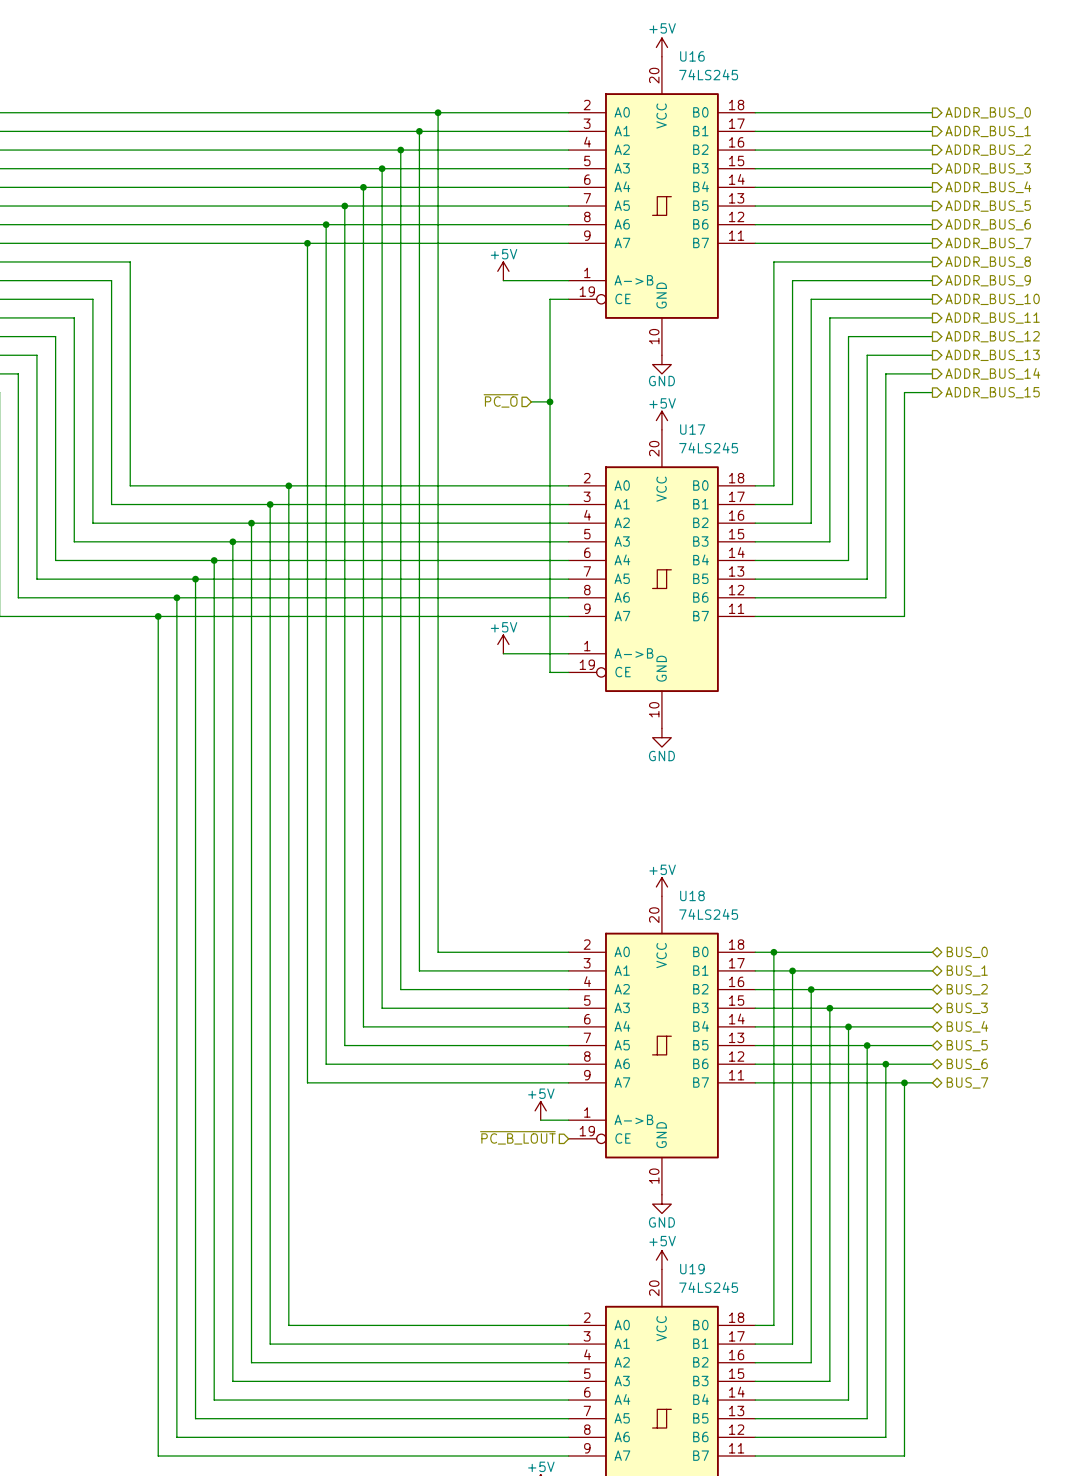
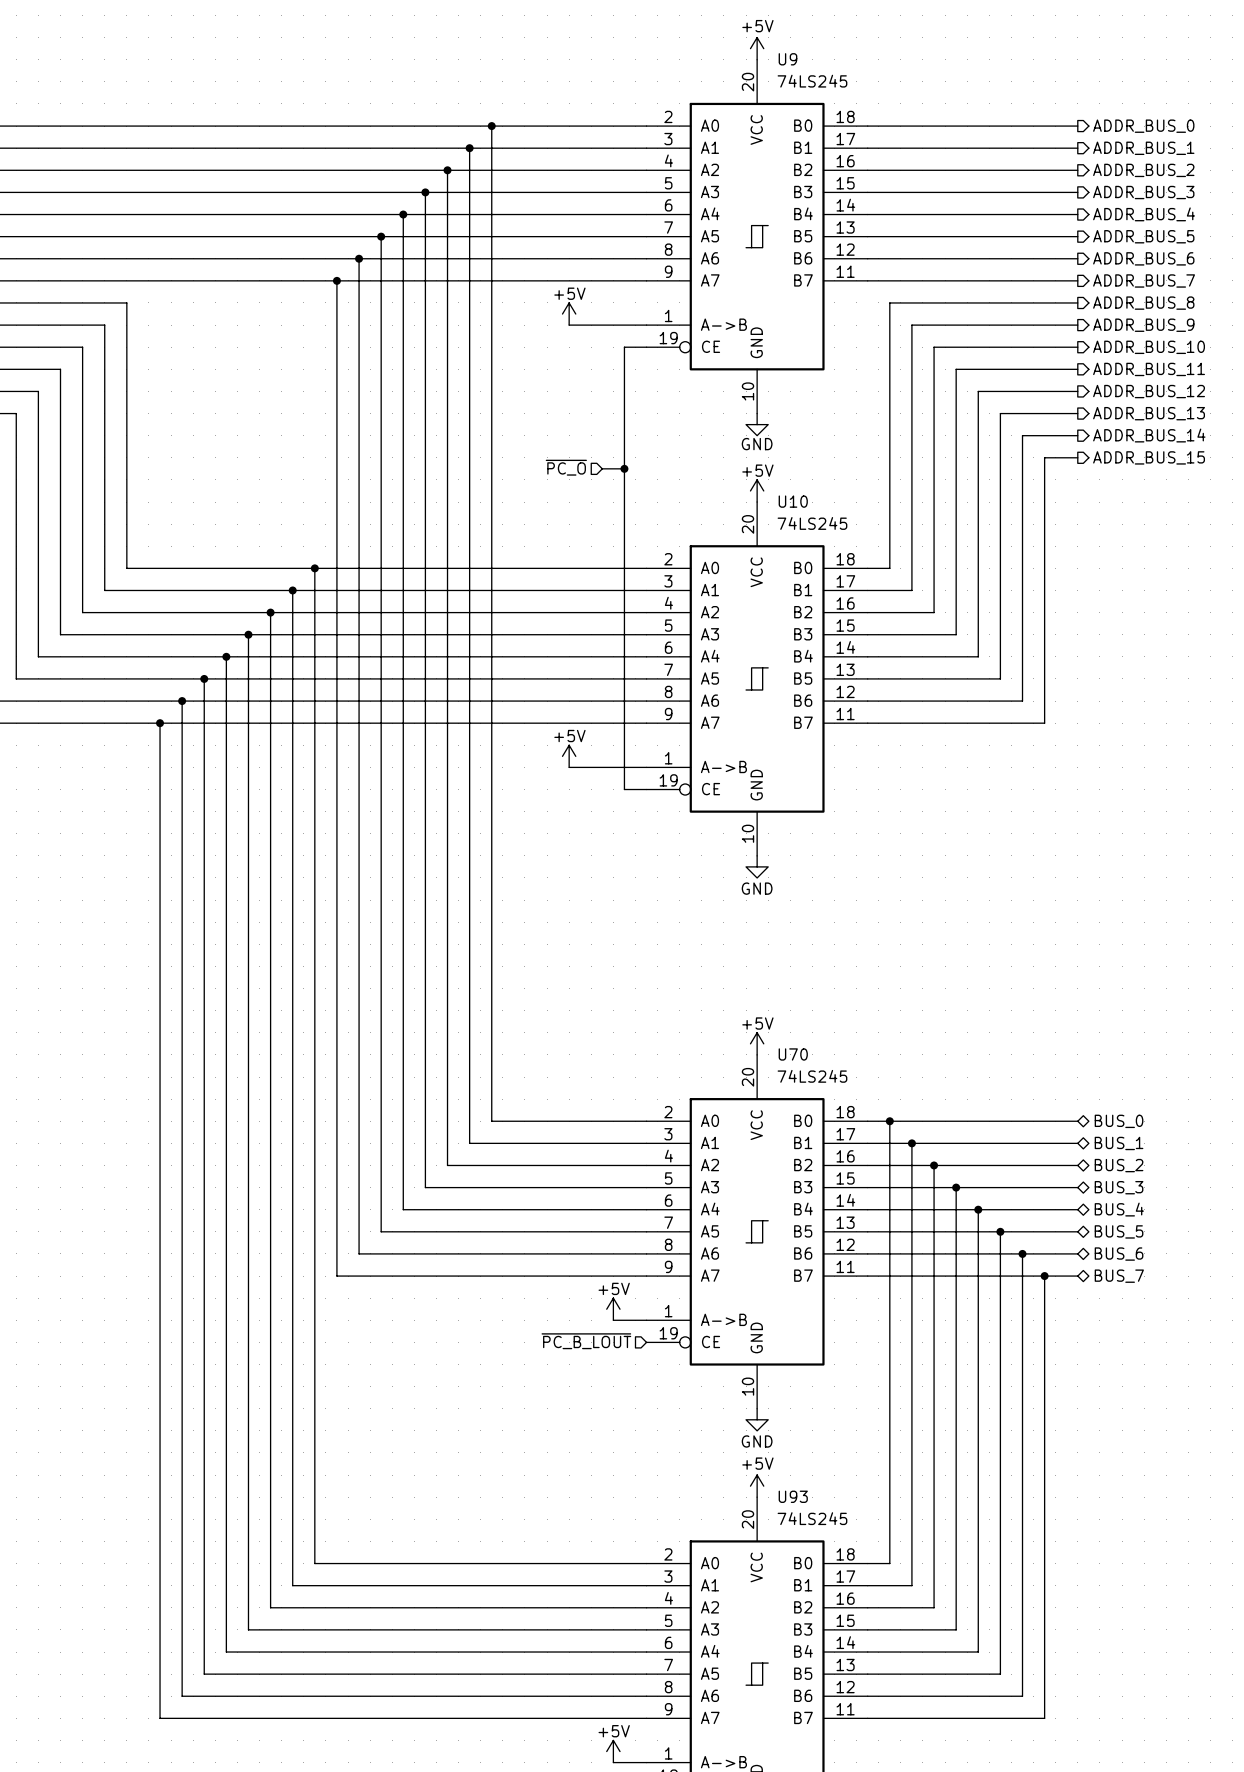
U16 name: U16 (692, 56) -> U9 (787, 59)
U17 name: U17 (692, 429) -> U10 (793, 501)
U18 name: U18 (692, 895) -> U70 (793, 1054)
U19 name: U19 (692, 1269) -> U93 (793, 1496)

